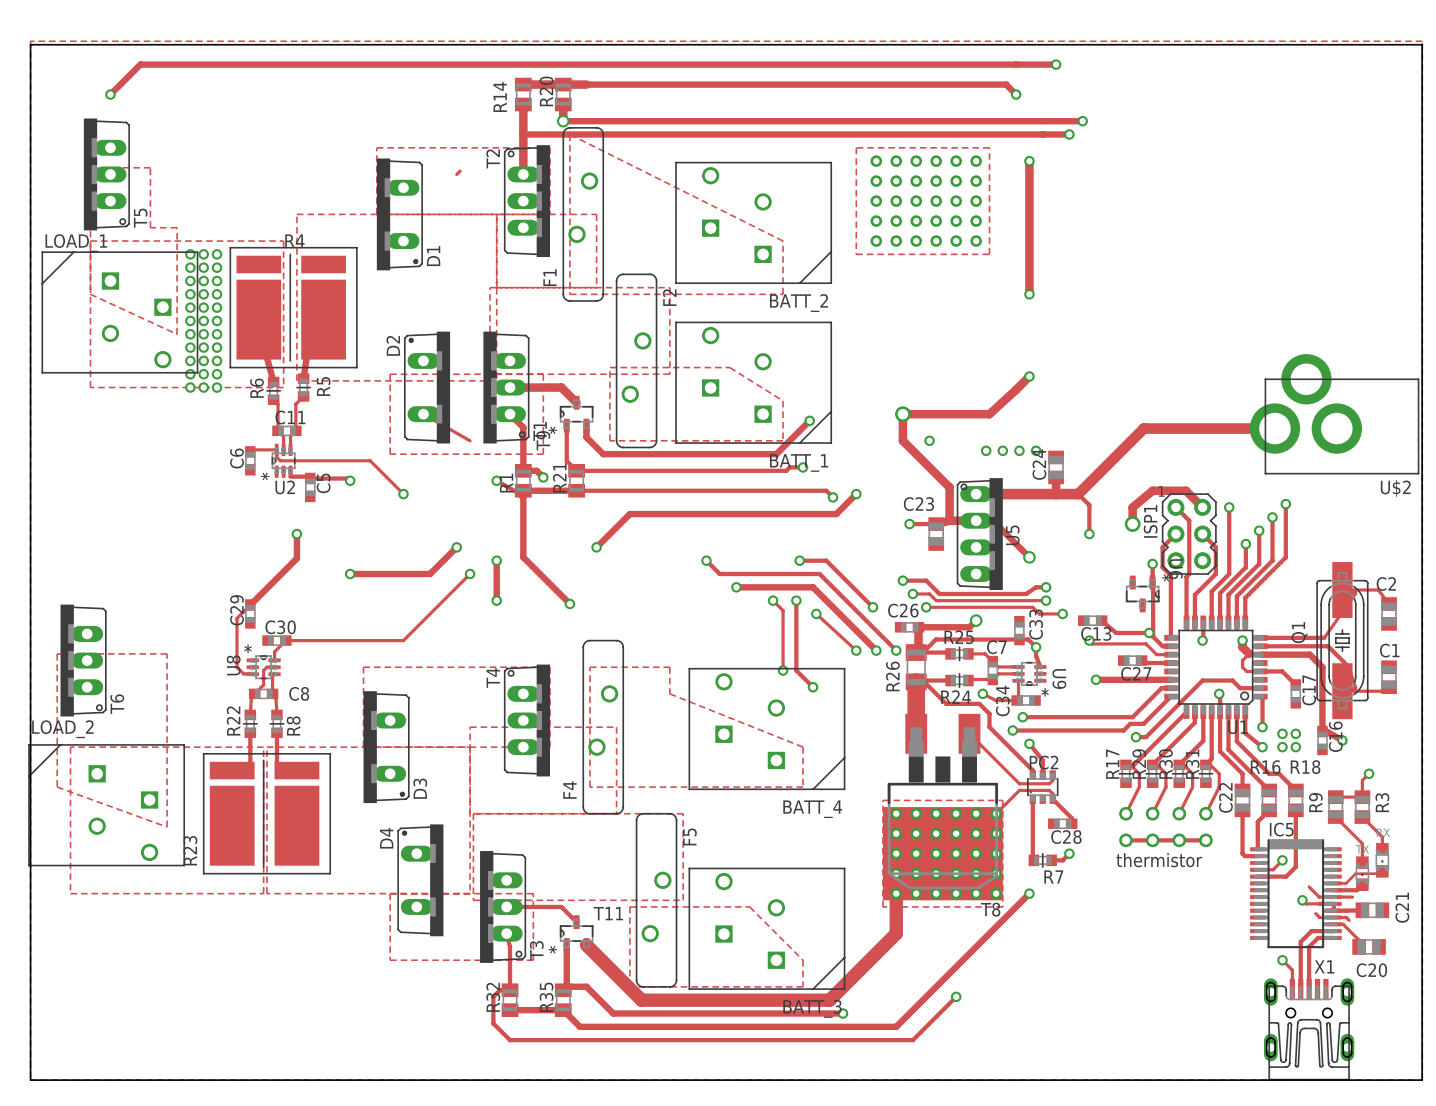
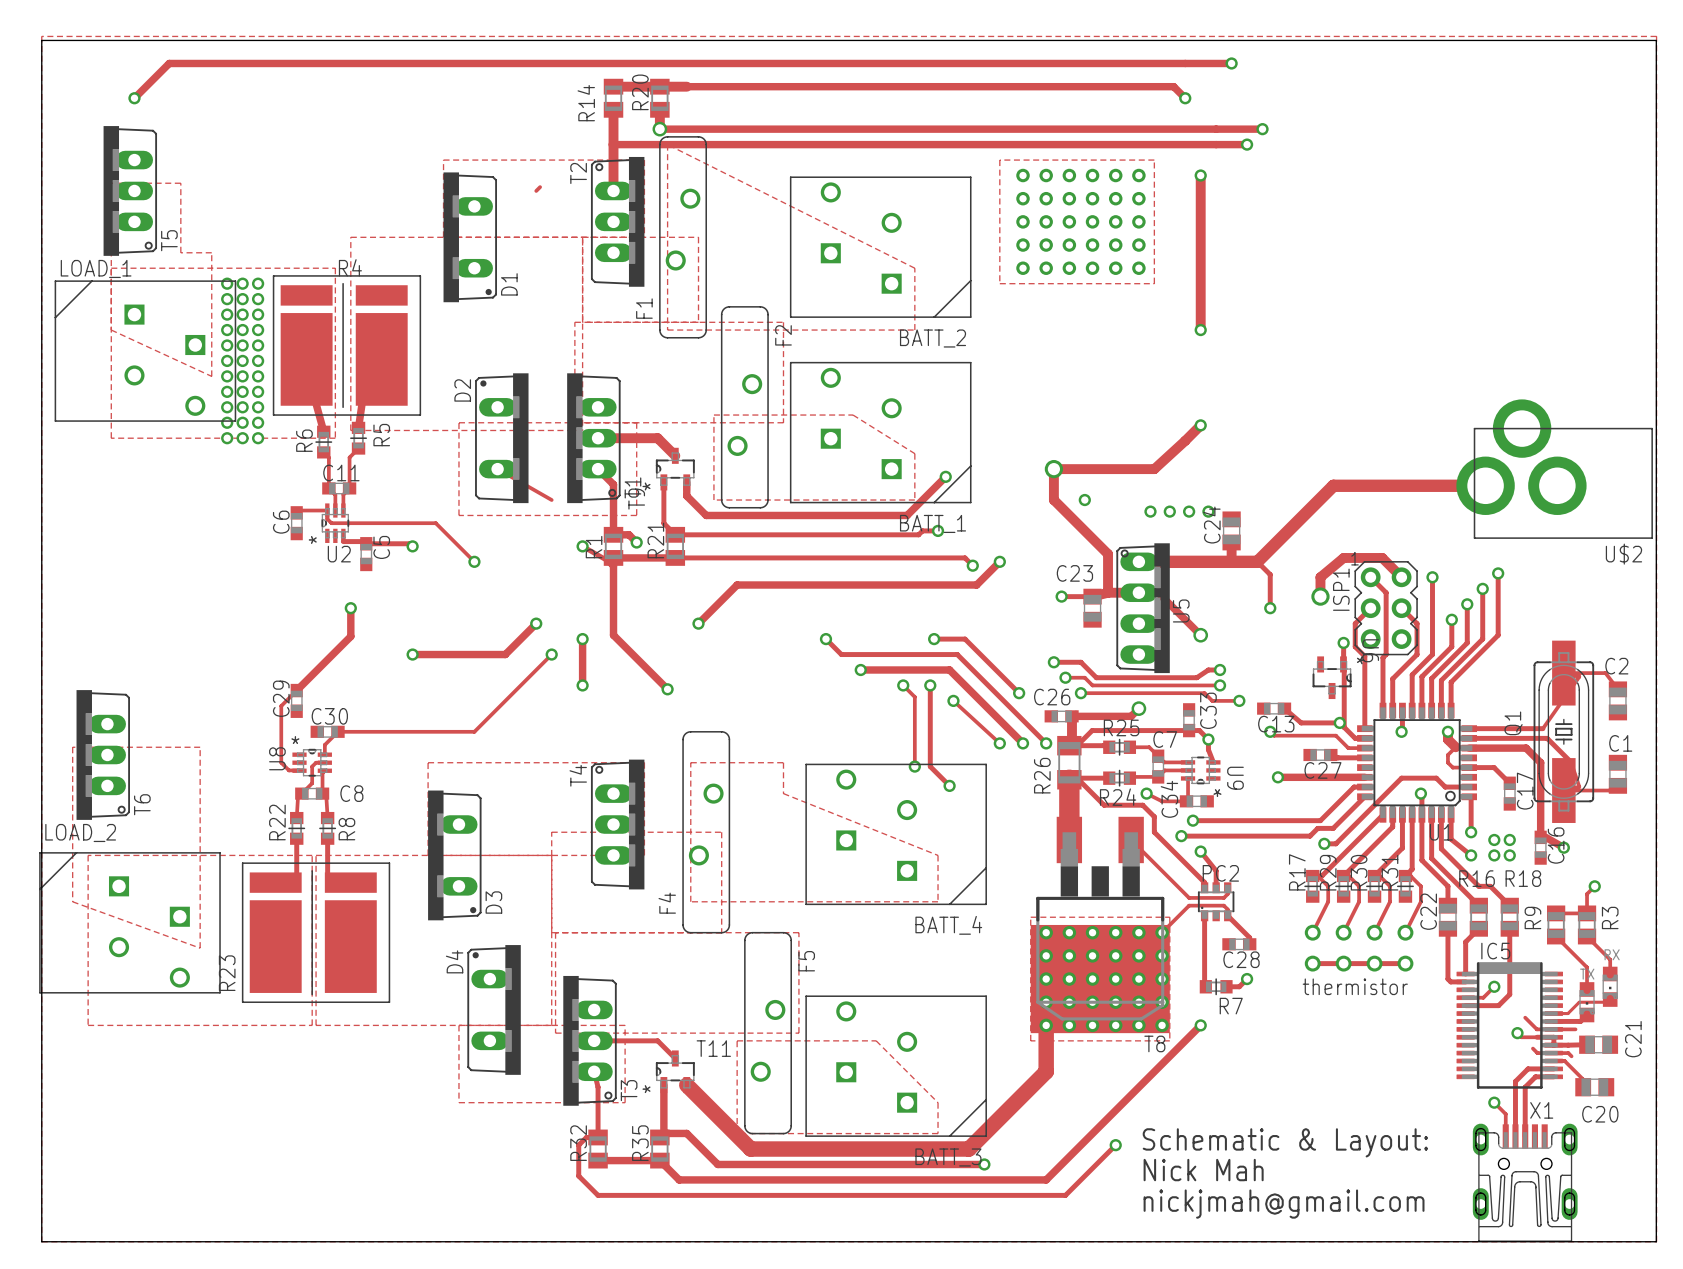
text: none -> Schematic & Layout: (1285, 1142)
text: none -> Nick Mah (1203, 1170)
text: none -> nickjmah@gmail.com (1284, 1204)

